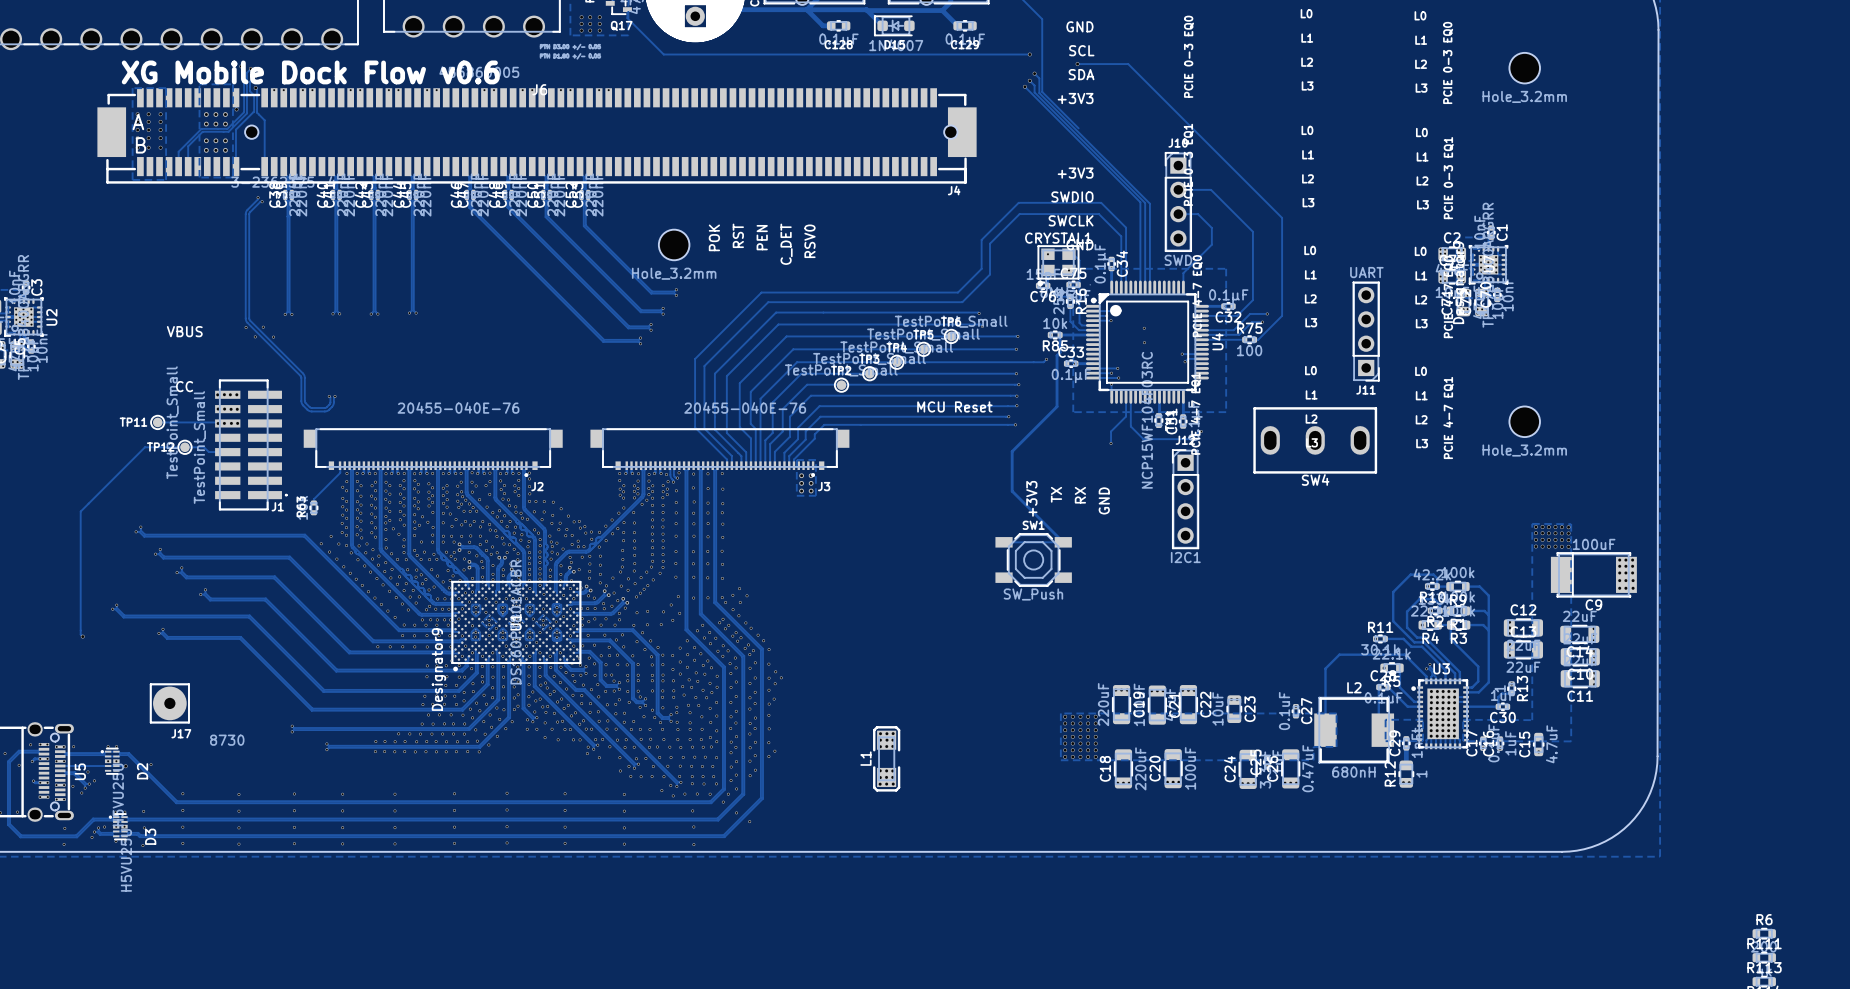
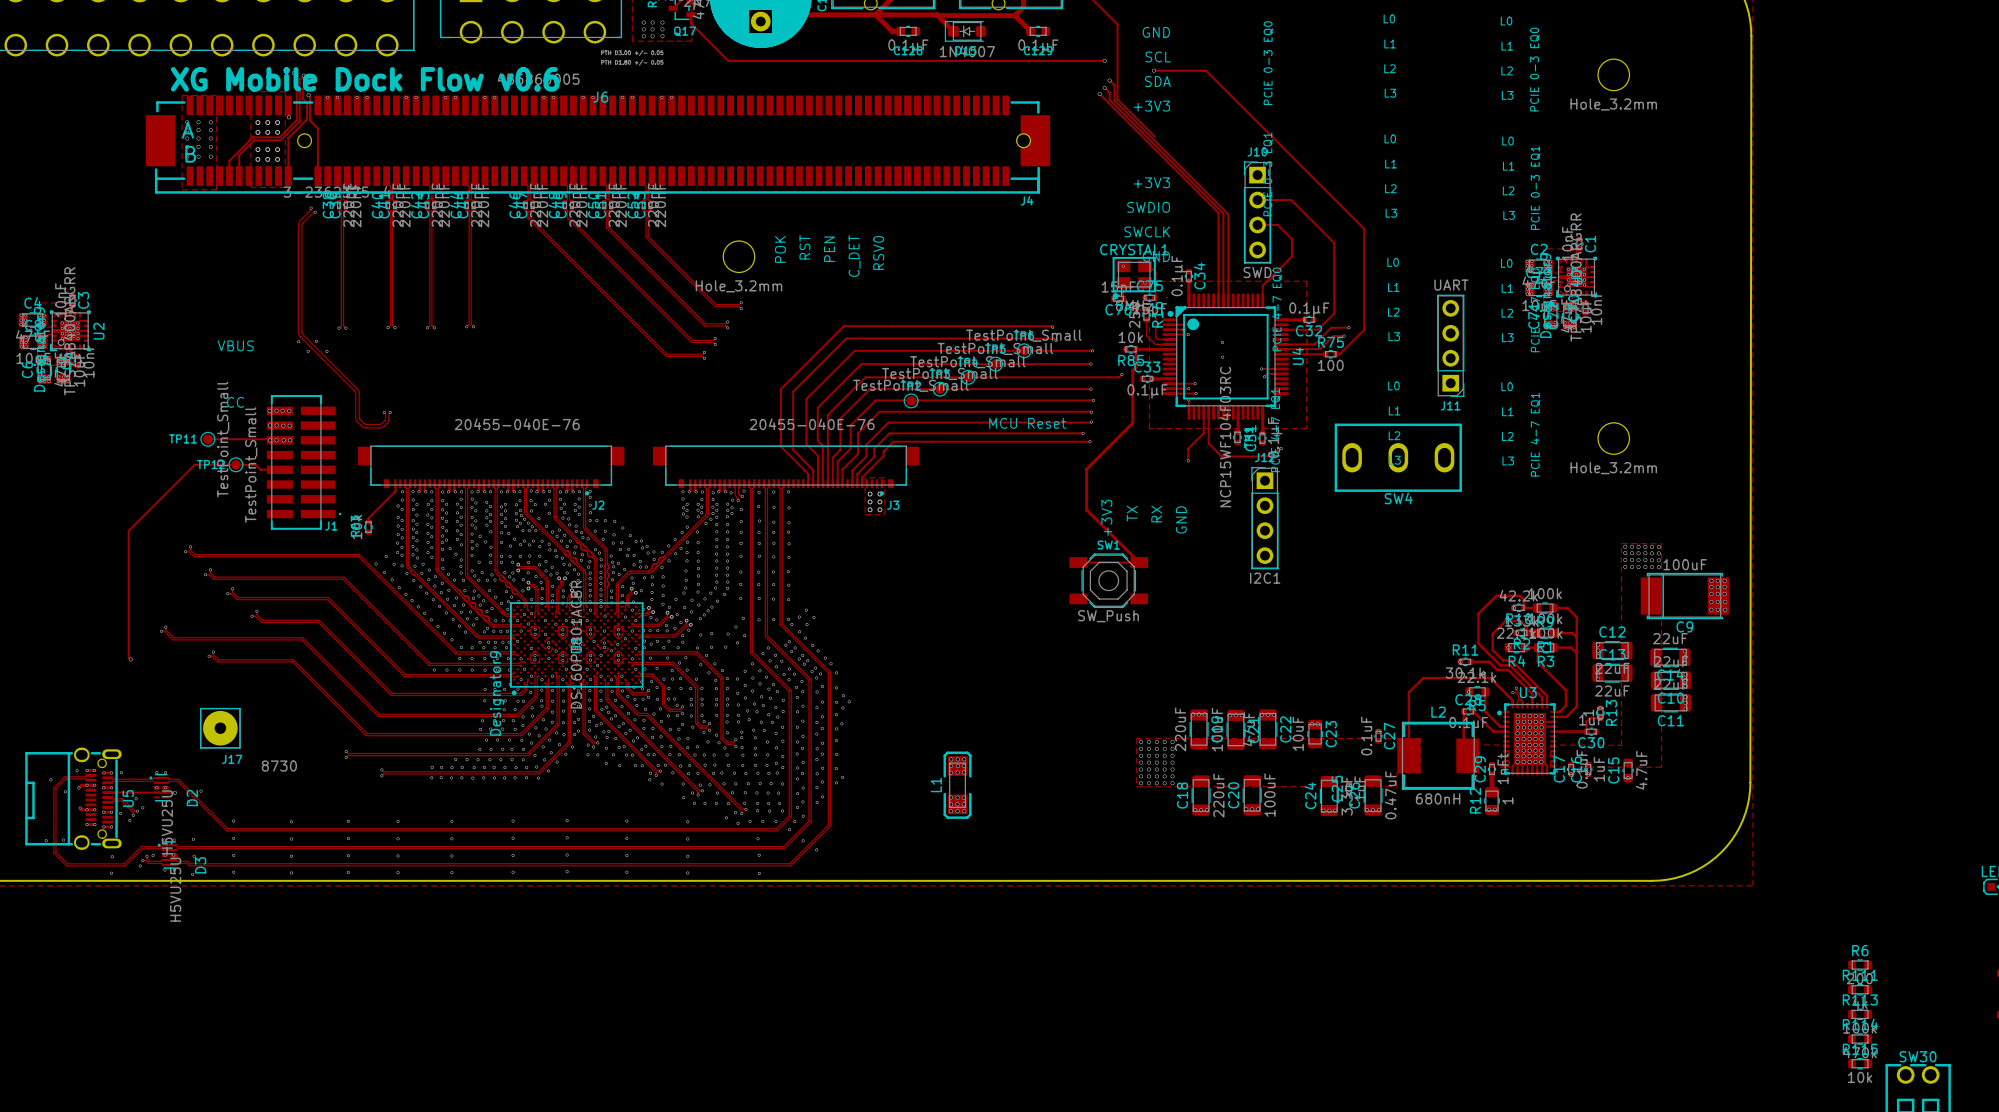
track: (1121, 287) (1121, 236) (1098, 214) (1019, 214) (989, 243) (989, 274) (962, 302) (768, 302) (704, 366) (704, 428) (731, 455) (731, 465) -> none
track: (1126, 287) (1126, 227) (1101, 202) (1018, 202) (981, 239) (981, 268) (957, 292) (761, 292) (695, 359) (695, 427) (727, 459) (727, 465) -> none

